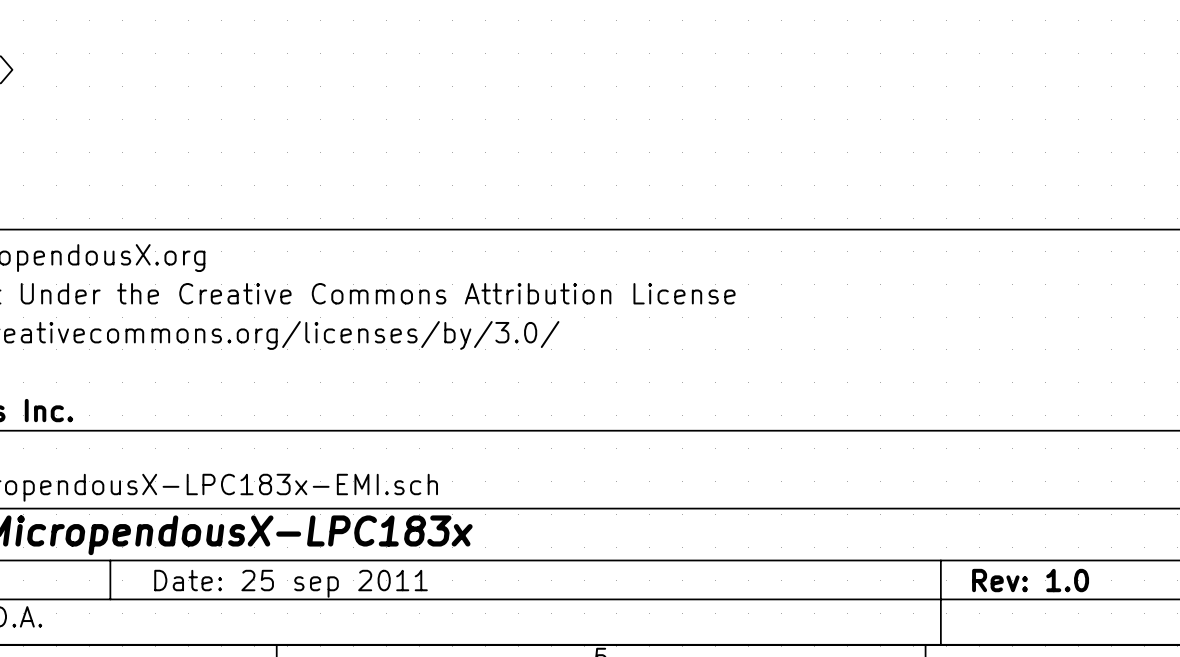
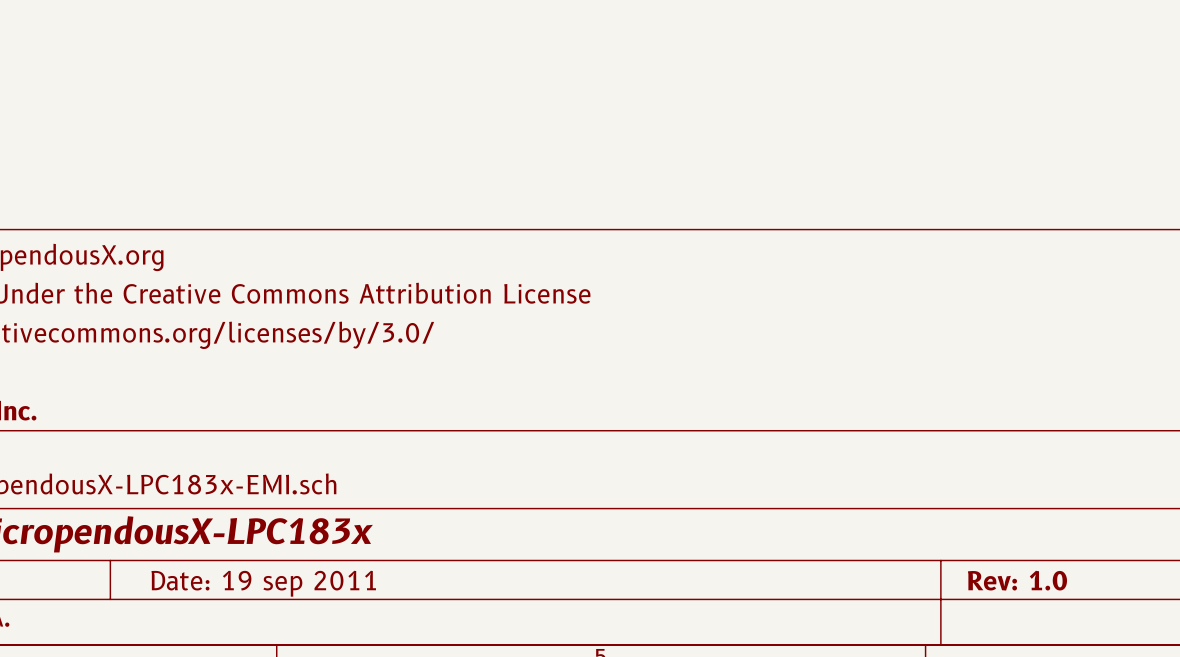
title block: Date: 25 sep 2011 (291, 583) -> Date: 19 sep 2011 (263, 583)

